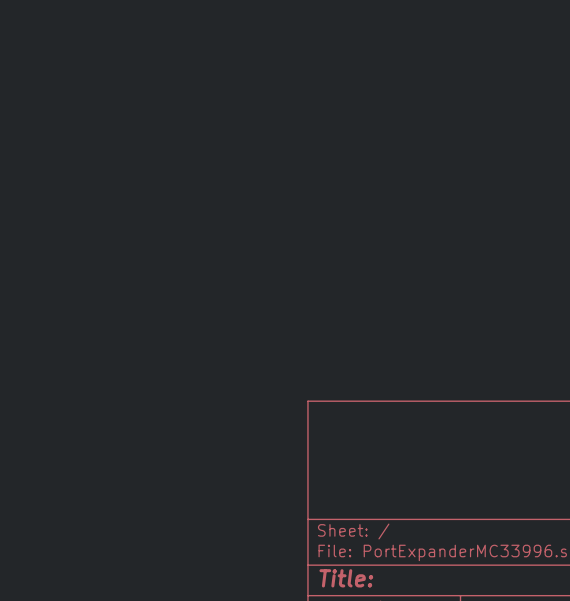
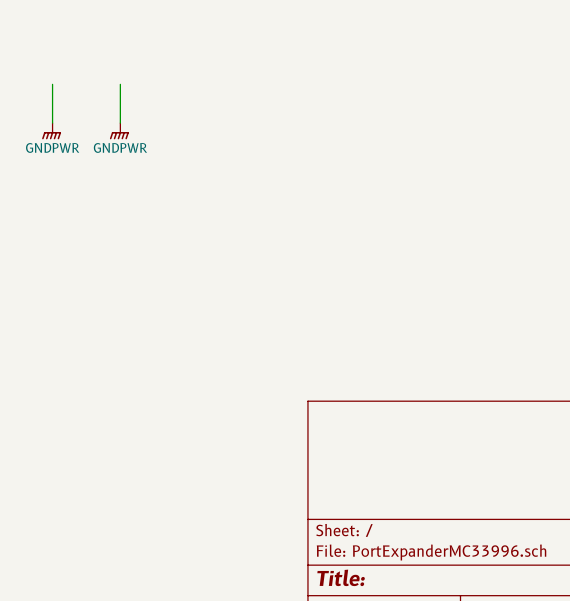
wire: none -> (52, 84) (52, 123)
wire: none -> (120, 84) (120, 123)
power symbol: none -> GNDPWR (51, 131)
power symbol: none -> GNDPWR (119, 131)

